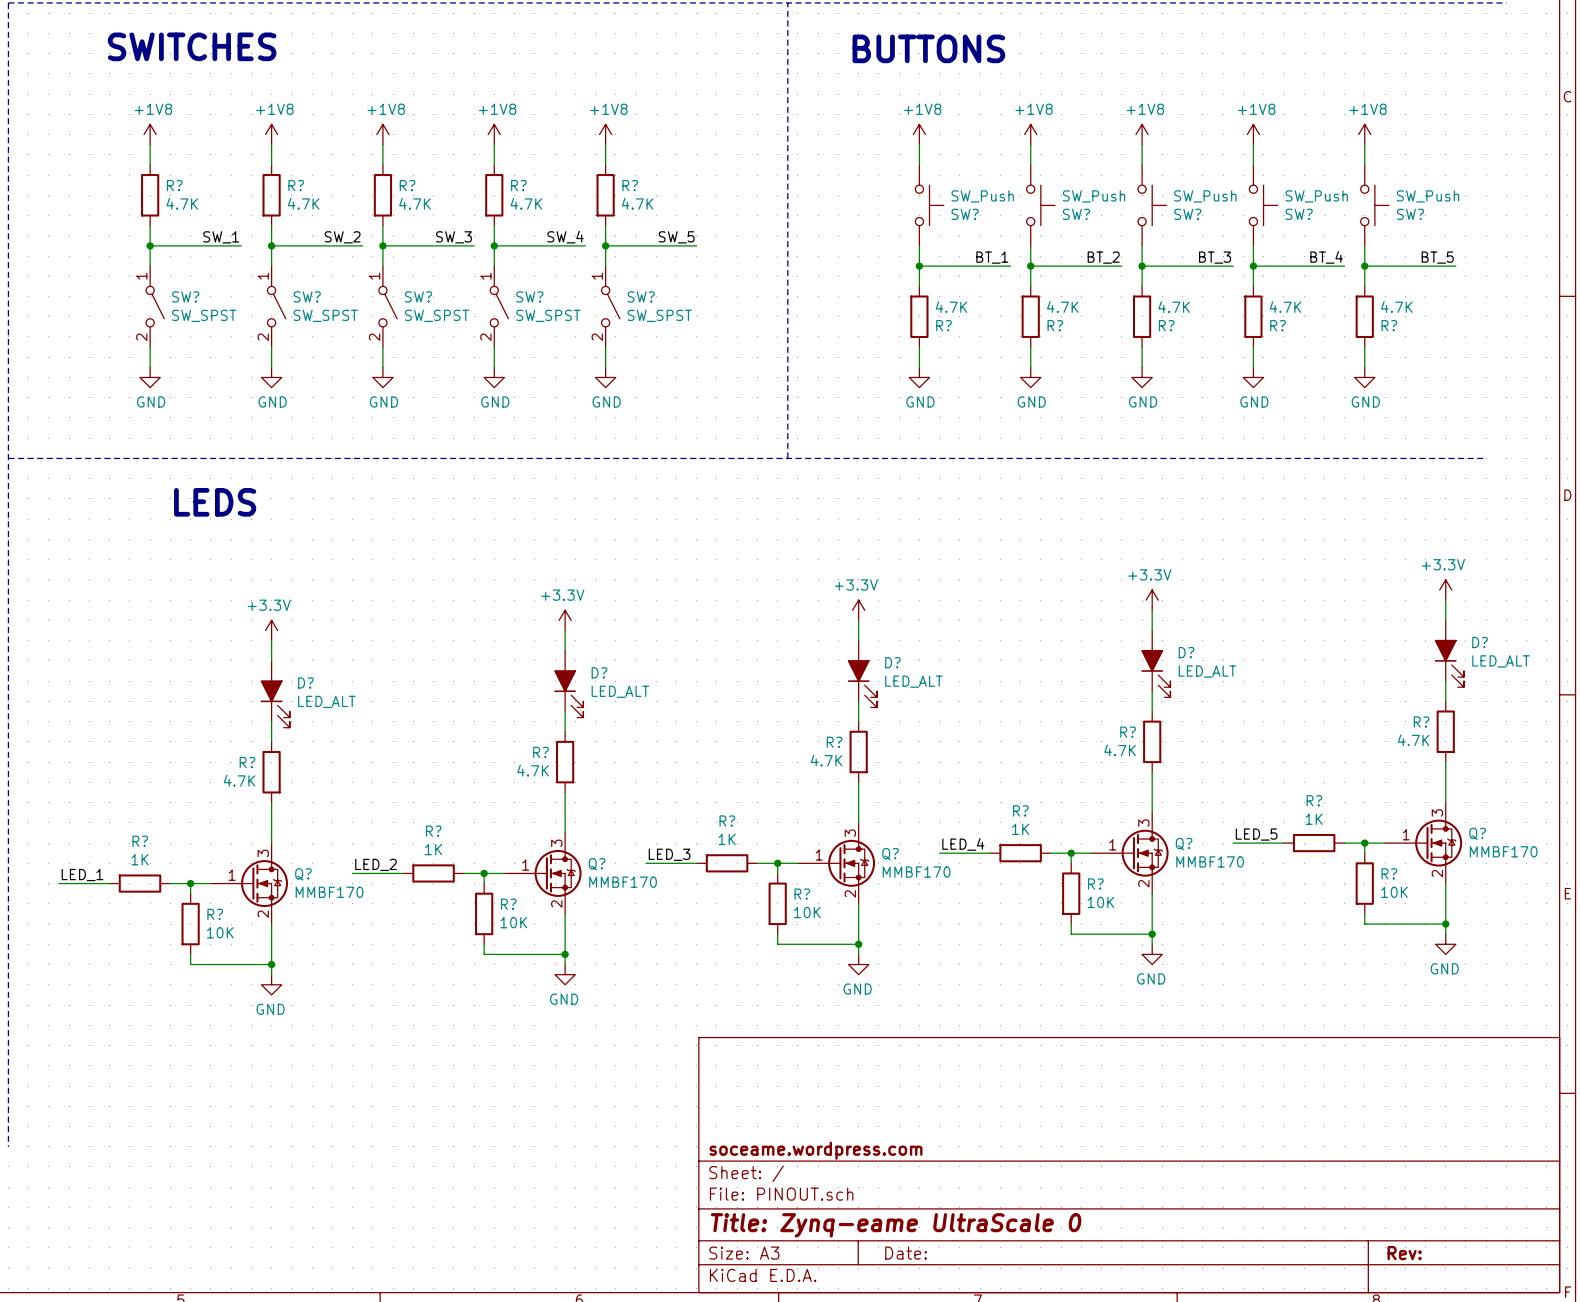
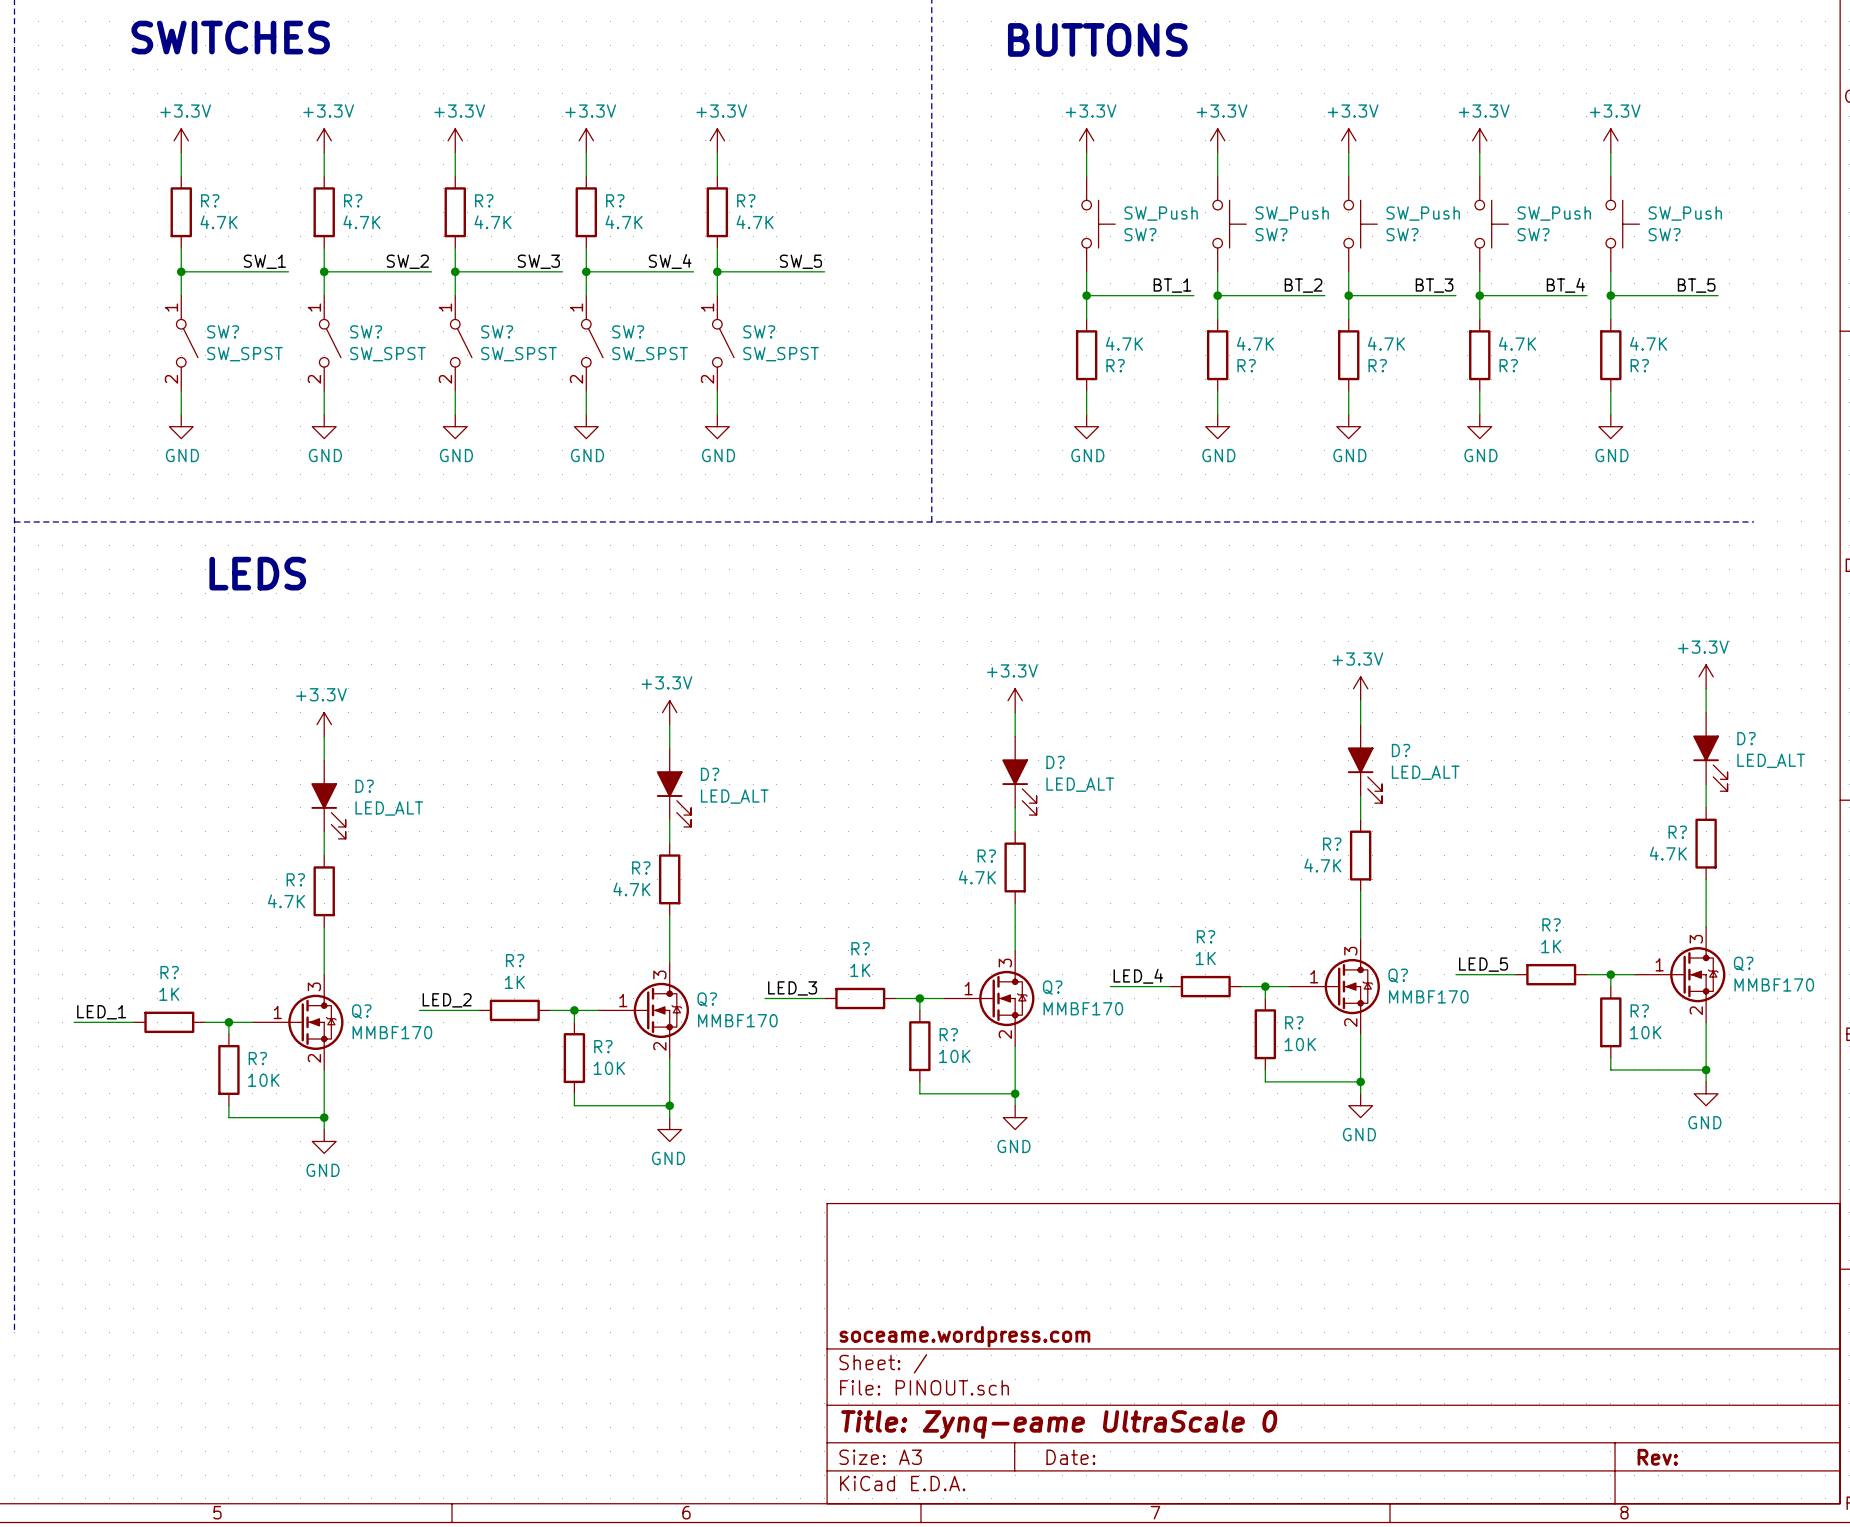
power symbol: +1V8 (150, 134) -> +3.3V (181, 140)
power symbol: +1V8 (271, 134) -> +3.3V (324, 140)
power symbol: +1V8 (382, 134) -> +3.3V (455, 140)
power symbol: +1V8 (494, 134) -> +3.3V (586, 140)
power symbol: +1V8 (605, 134) -> +3.3V (717, 140)
power symbol: +1V8 (919, 134) -> +3.3V (1086, 140)
power symbol: +1V8 (1030, 134) -> +3.3V (1217, 140)
power symbol: +1V8 (1142, 134) -> +3.3V (1348, 140)
power symbol: +1V8 (1253, 134) -> +3.3V (1479, 140)
power symbol: +1V8 (1364, 134) -> +3.3V (1610, 140)

